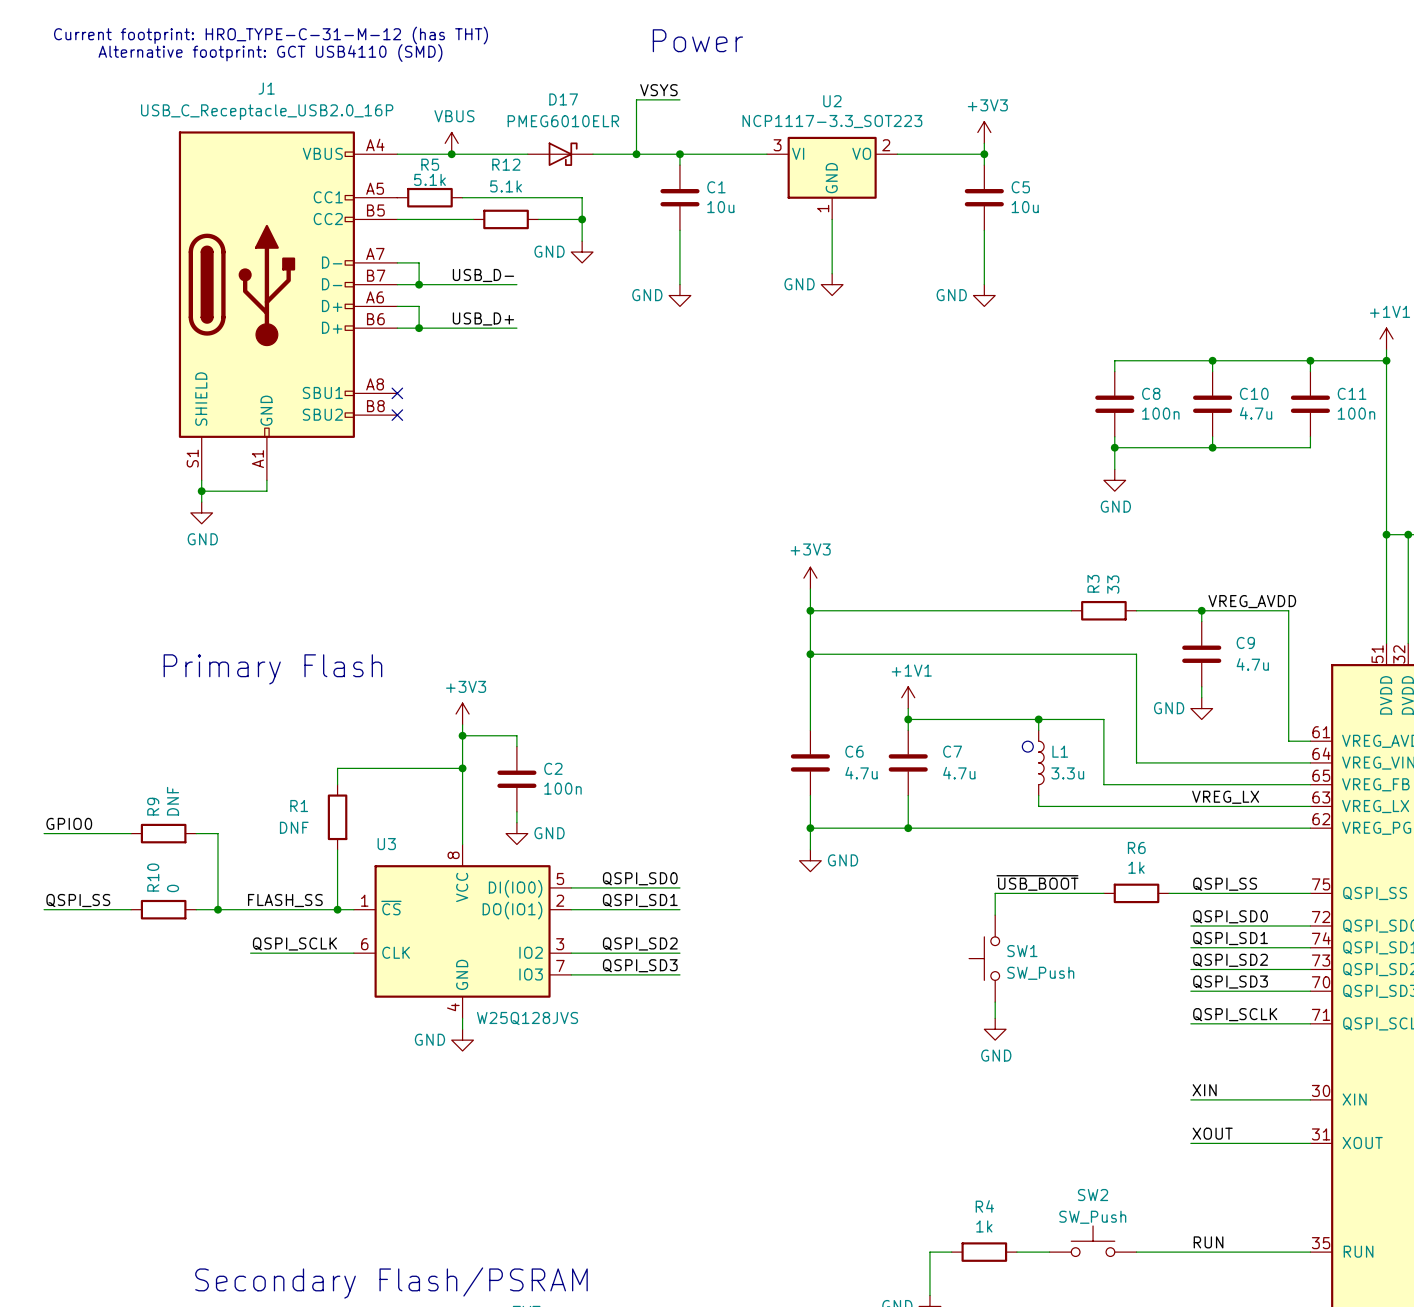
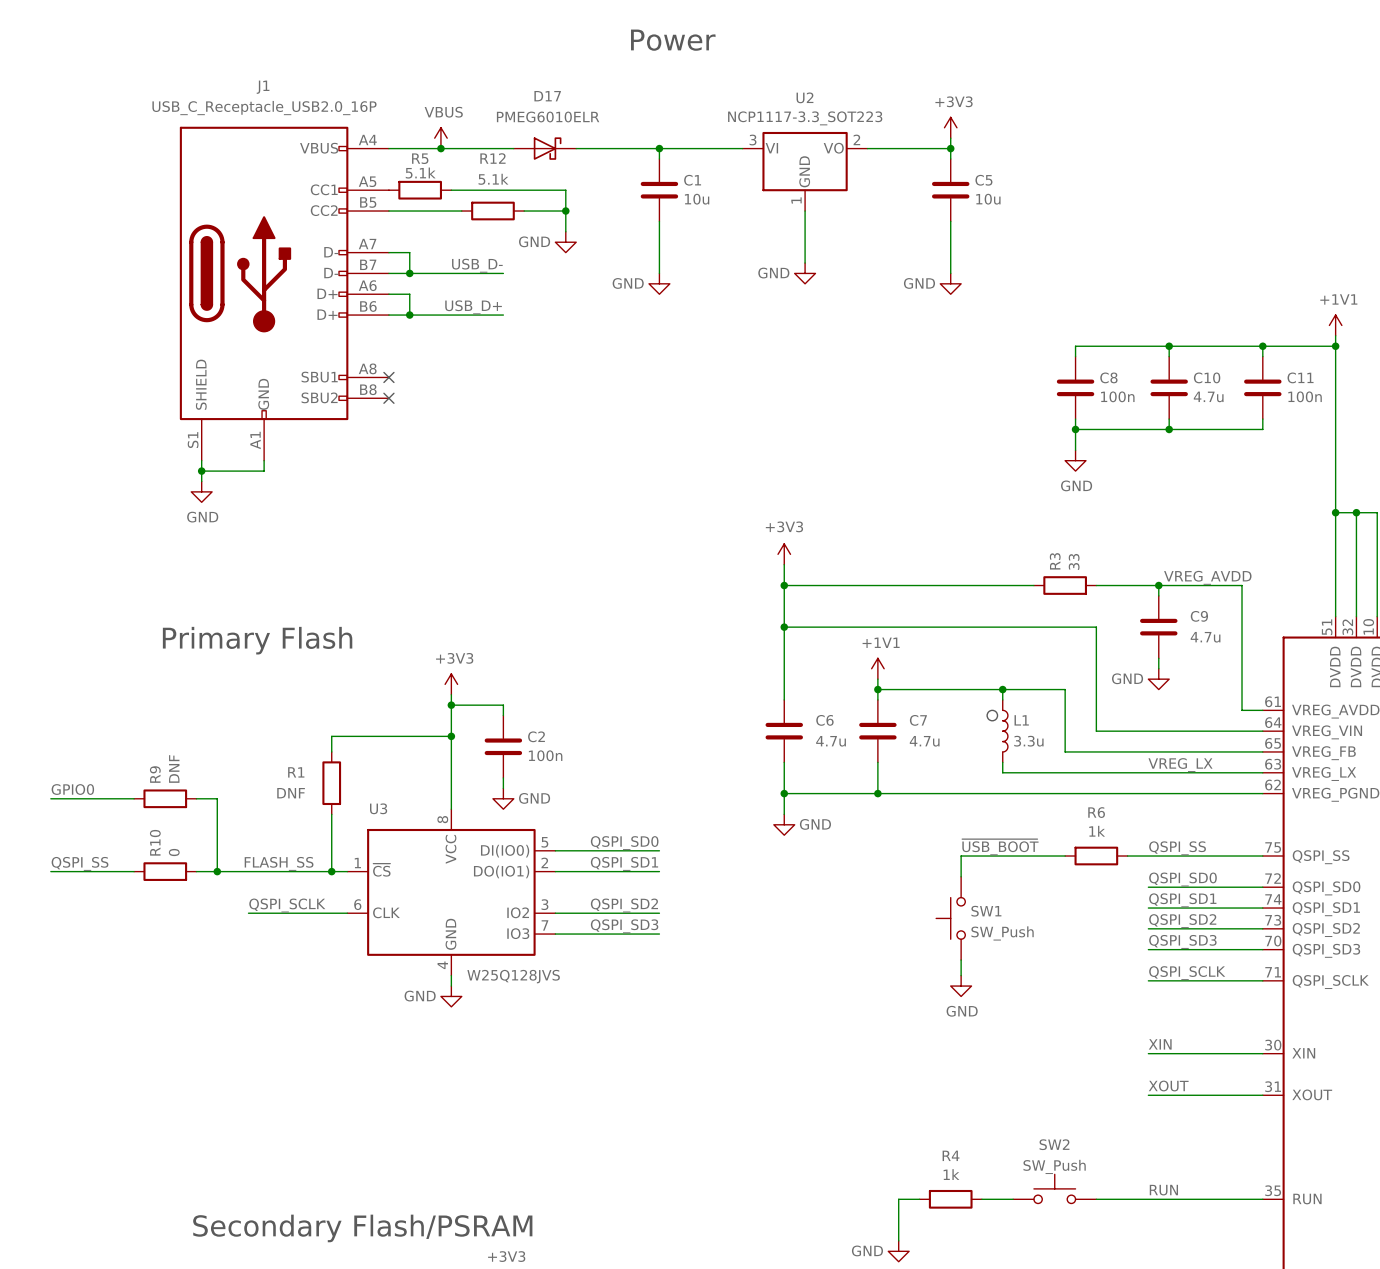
text: Current footprint: HRO_TYPE-C-31-M-12 (has THT) (271, 35) -> none
text: Alternative footprint: GCT USB4110 (SMD) (270, 53) -> none
label: VSYS (658, 90) -> none
wire: (679, 99) (636, 99) (636, 154) -> none
junction: (636, 154) -> none

